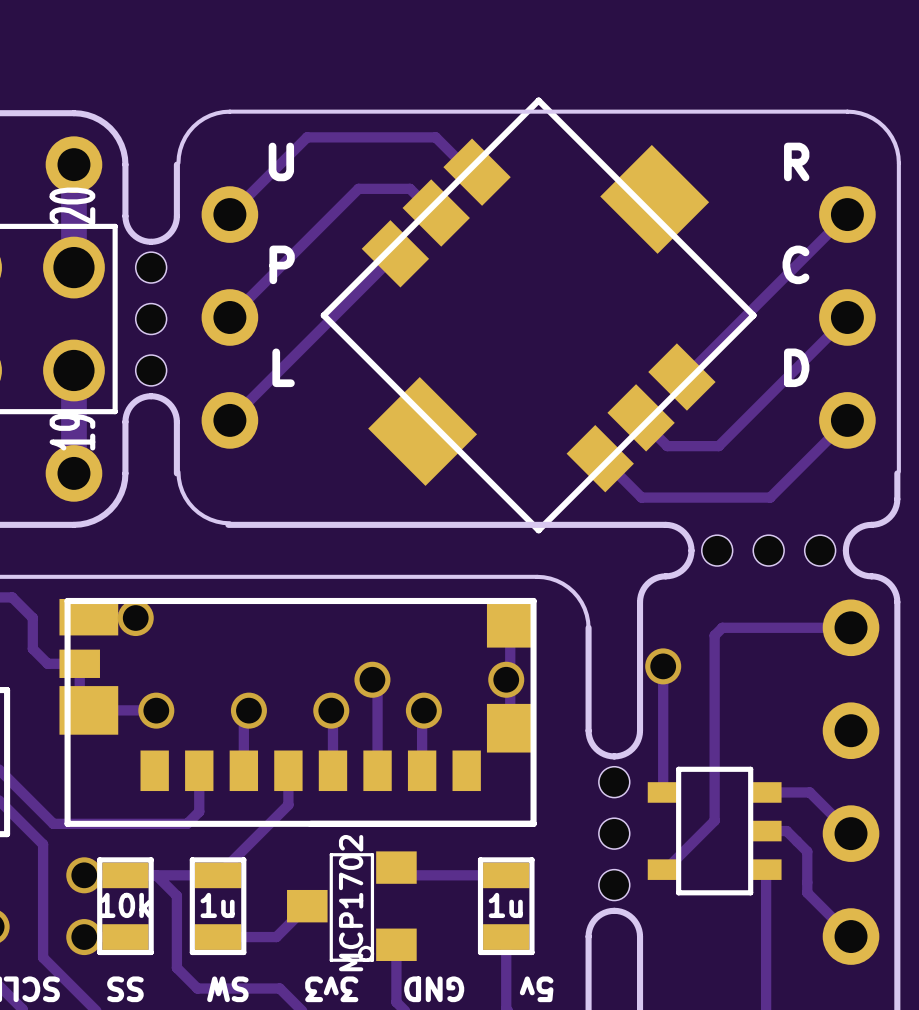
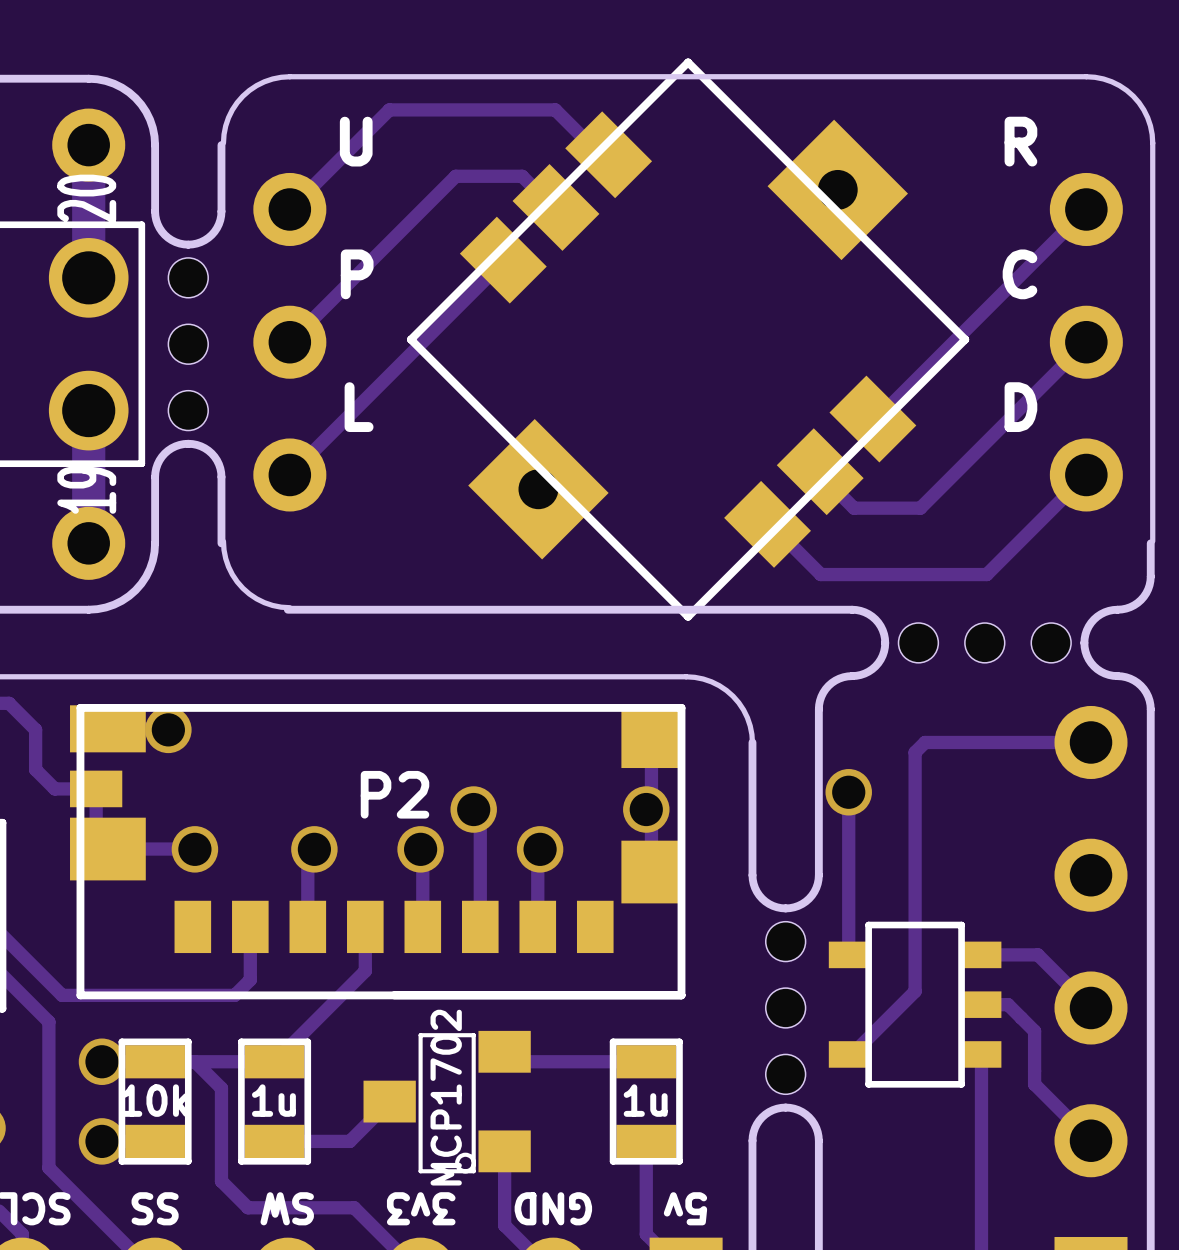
part footprint: [320, 97, 757, 534] -> [407, 58, 970, 621]
P2 name: none -> P2 (395, 794)

